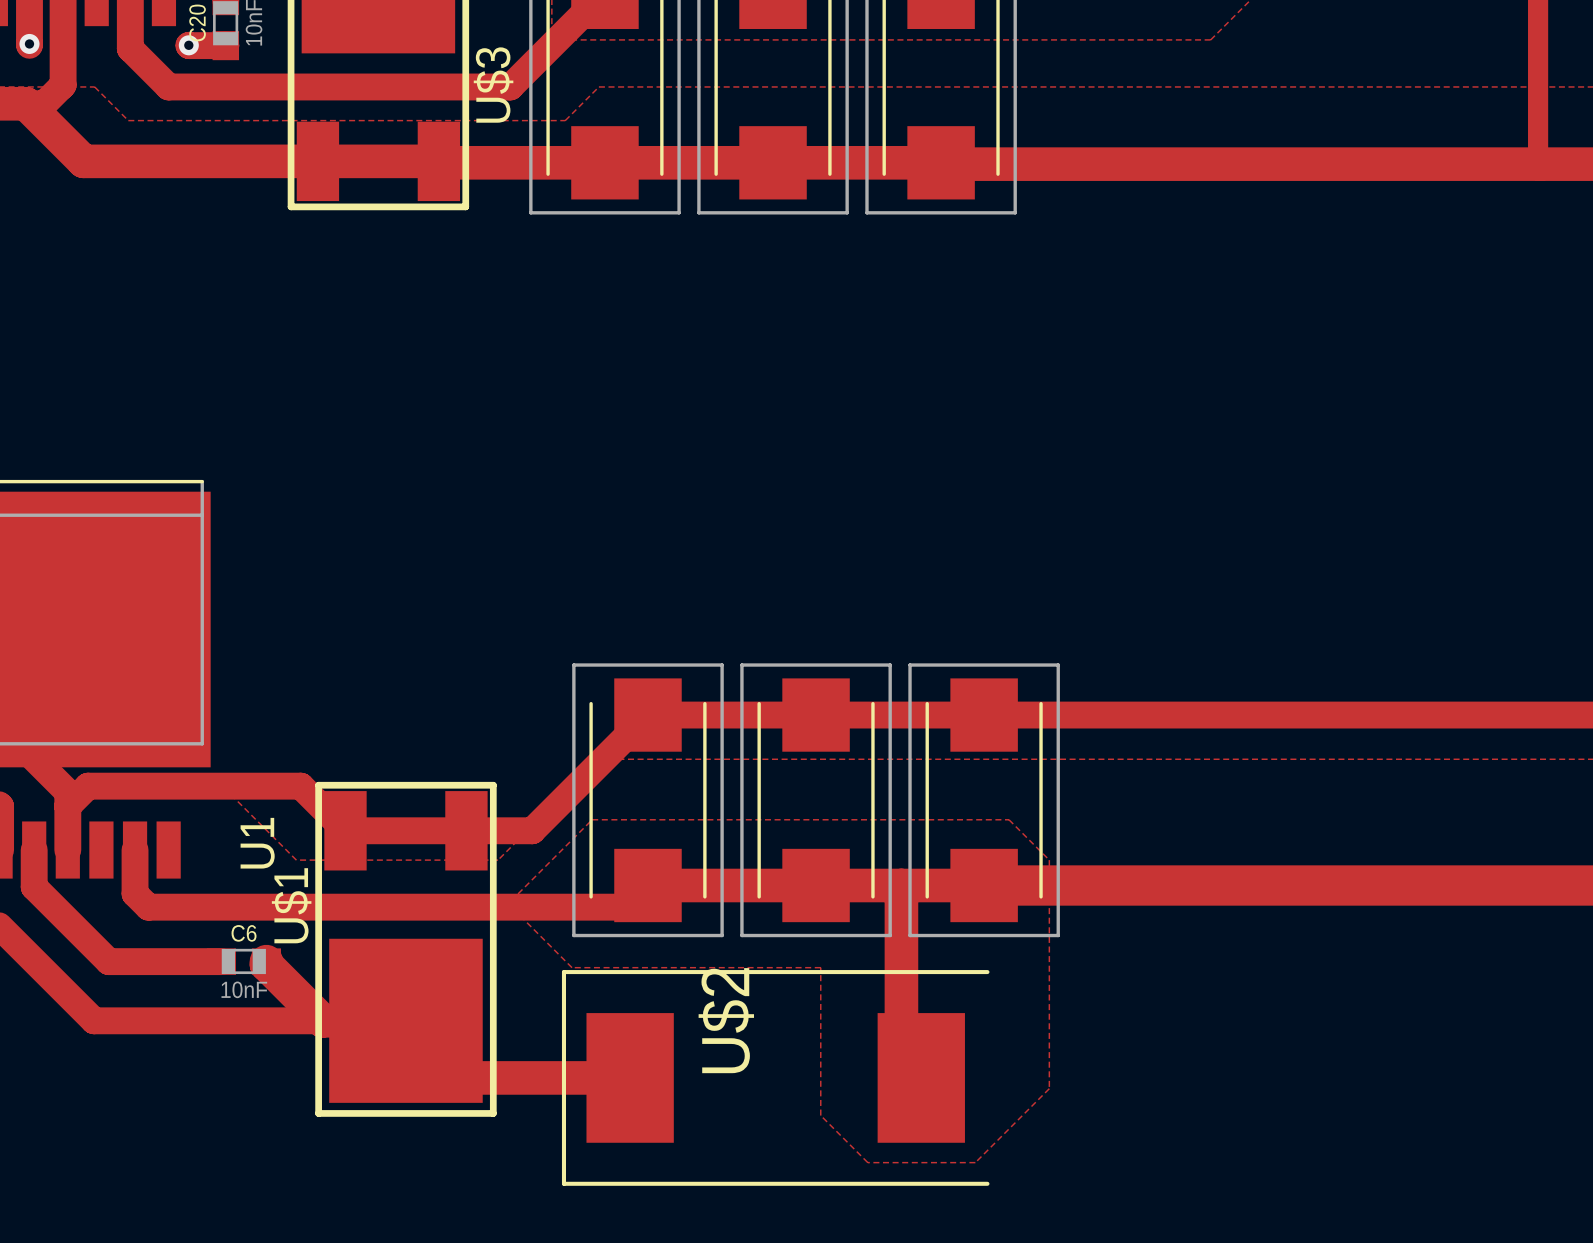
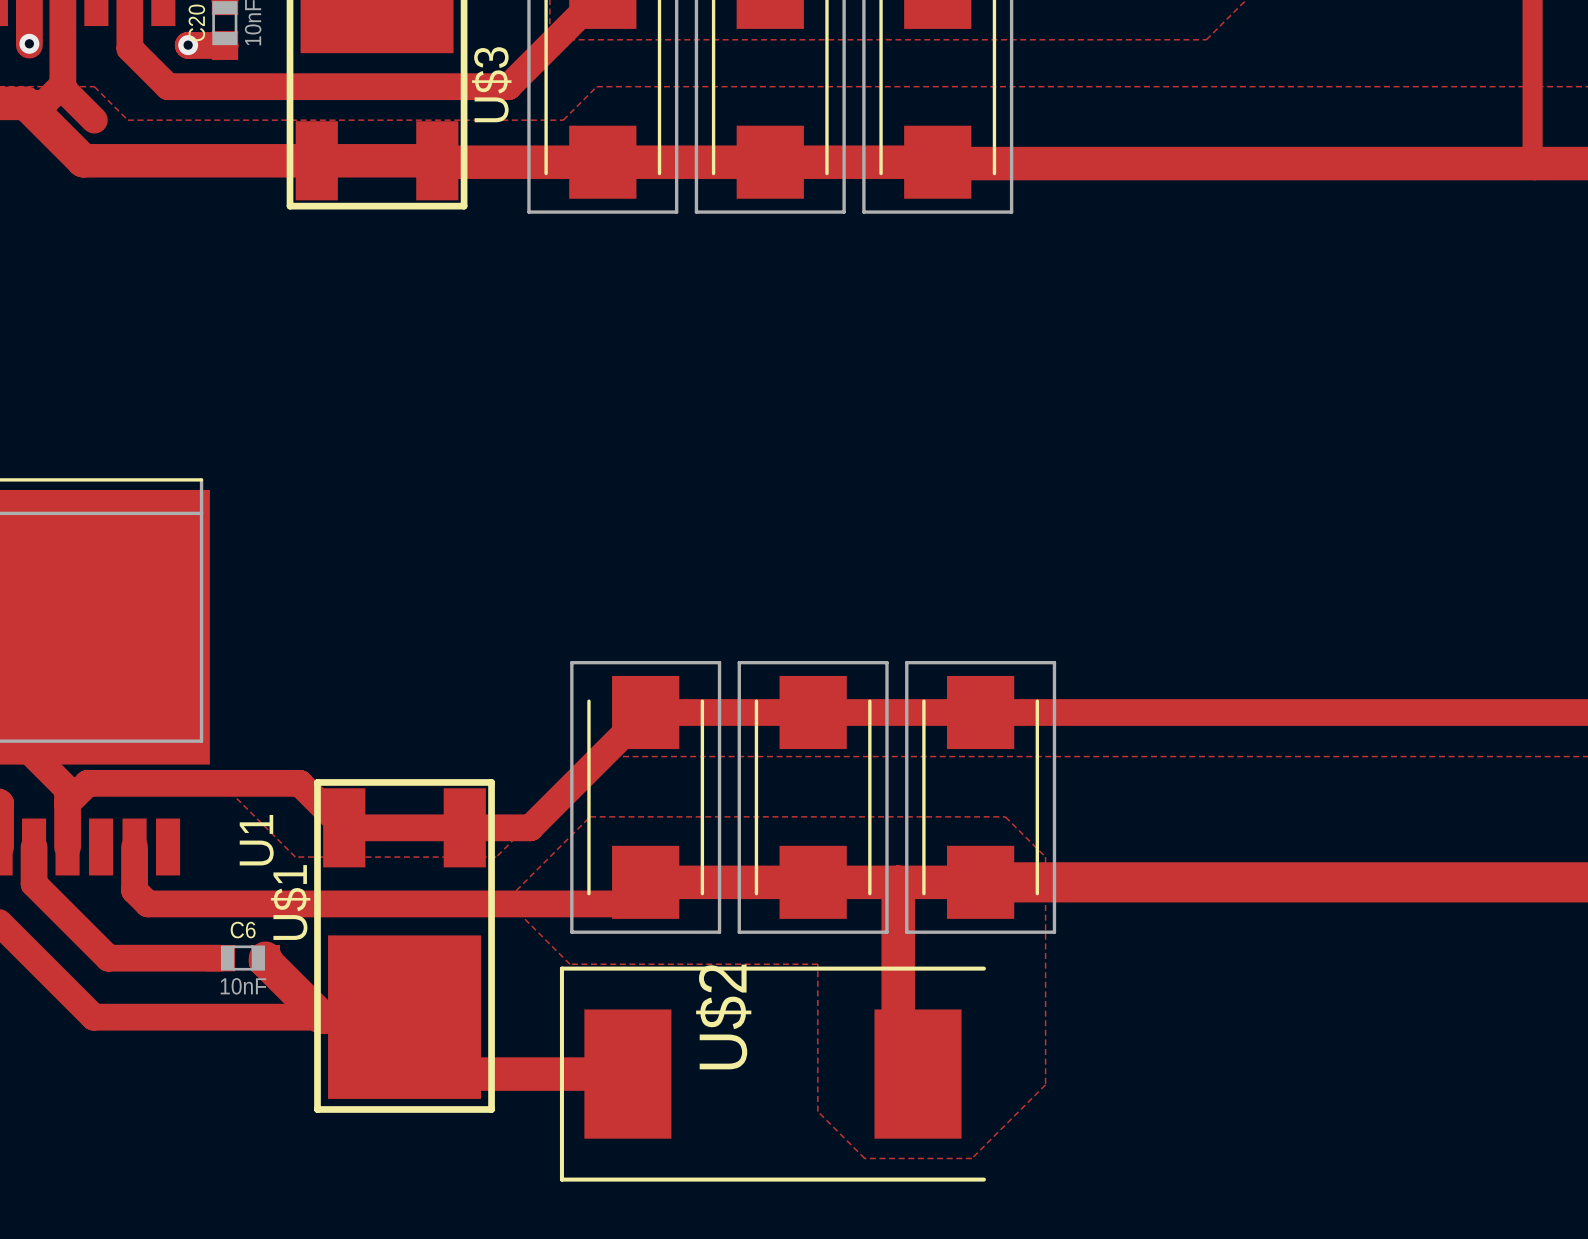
track: none -> (62, 84) (62, 88) (94, 120)

